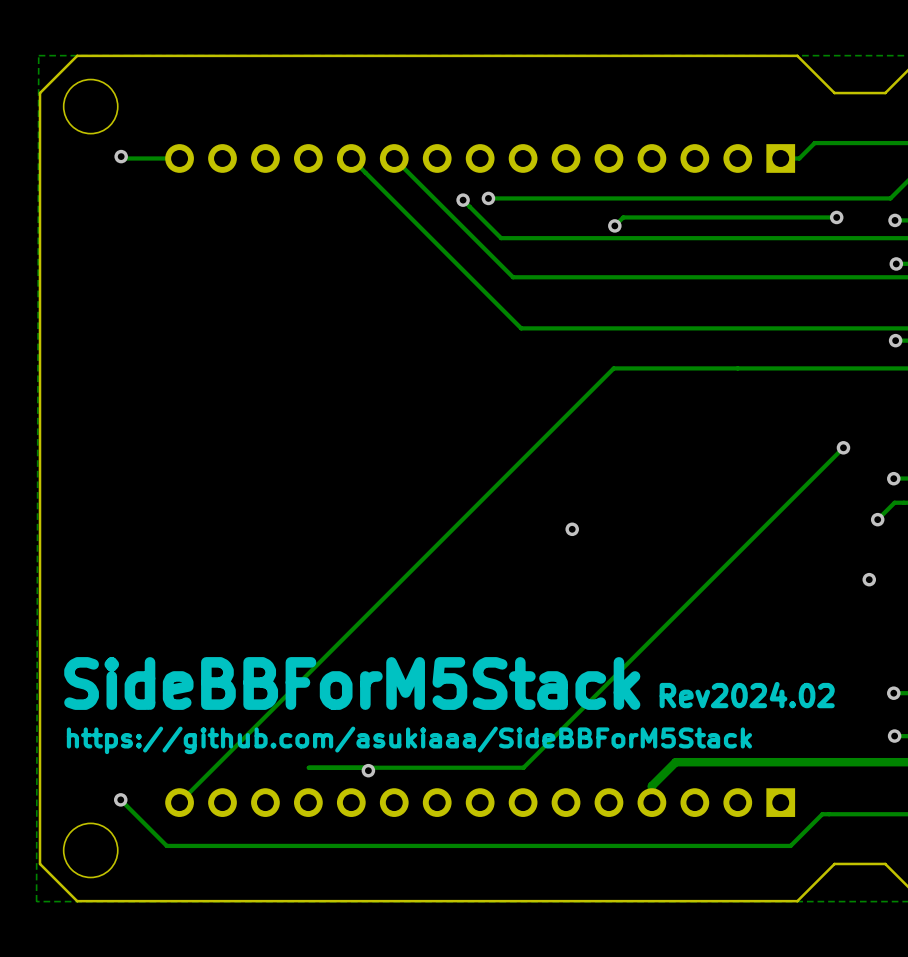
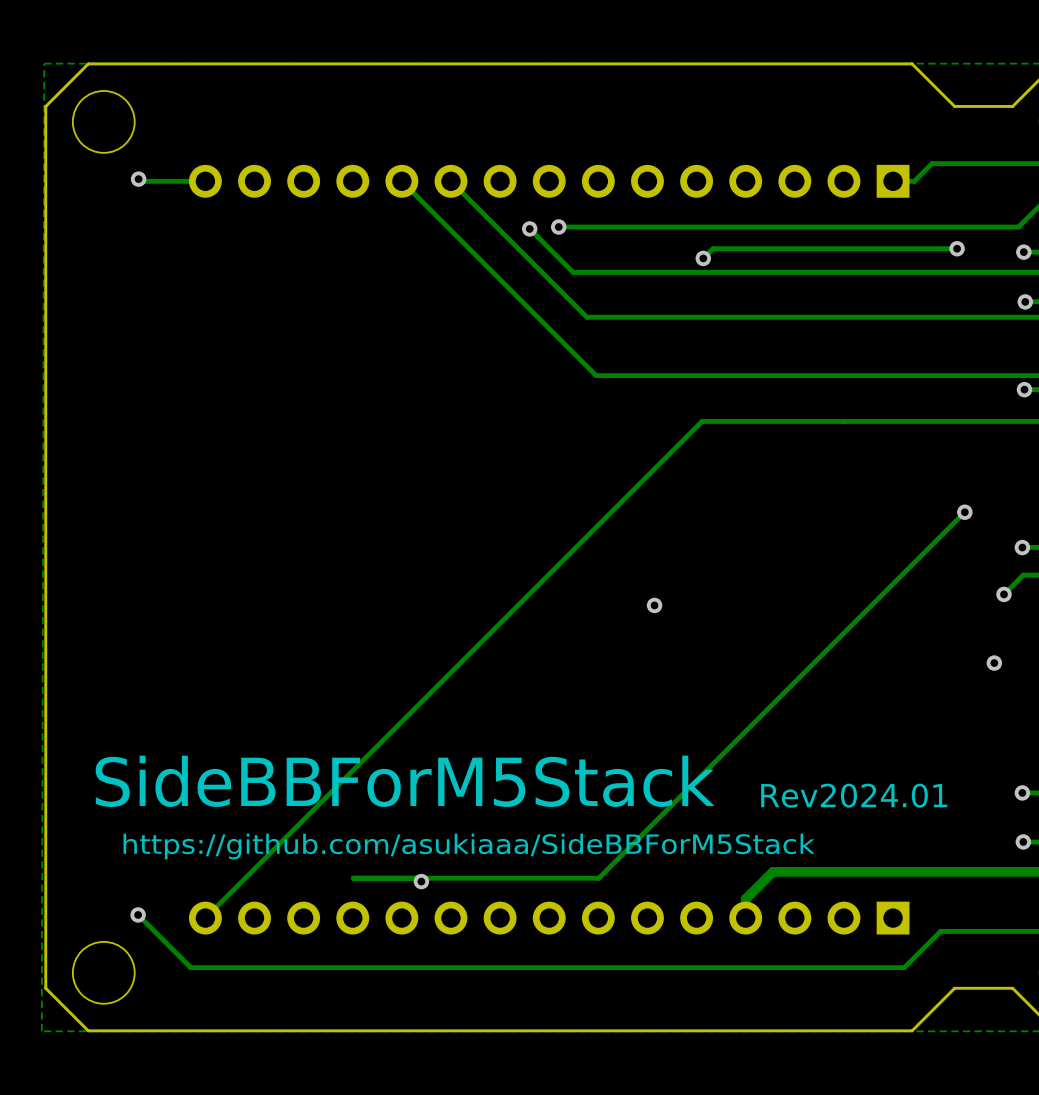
text: Rev2024.02 (747, 695) -> Rev2024.01 (854, 795)

